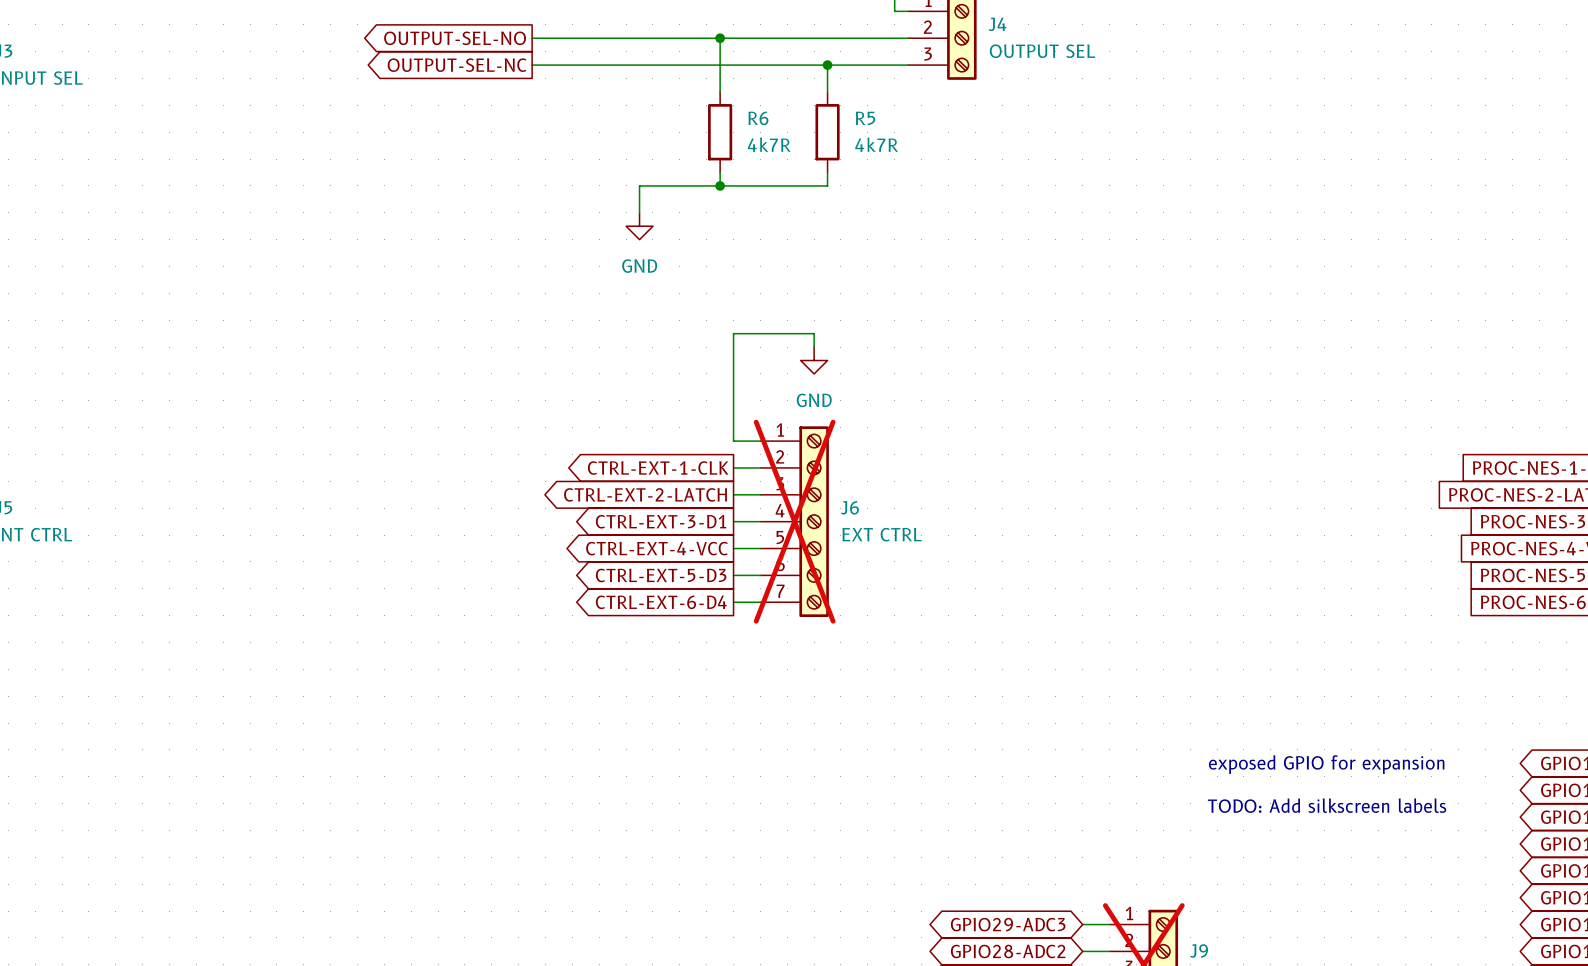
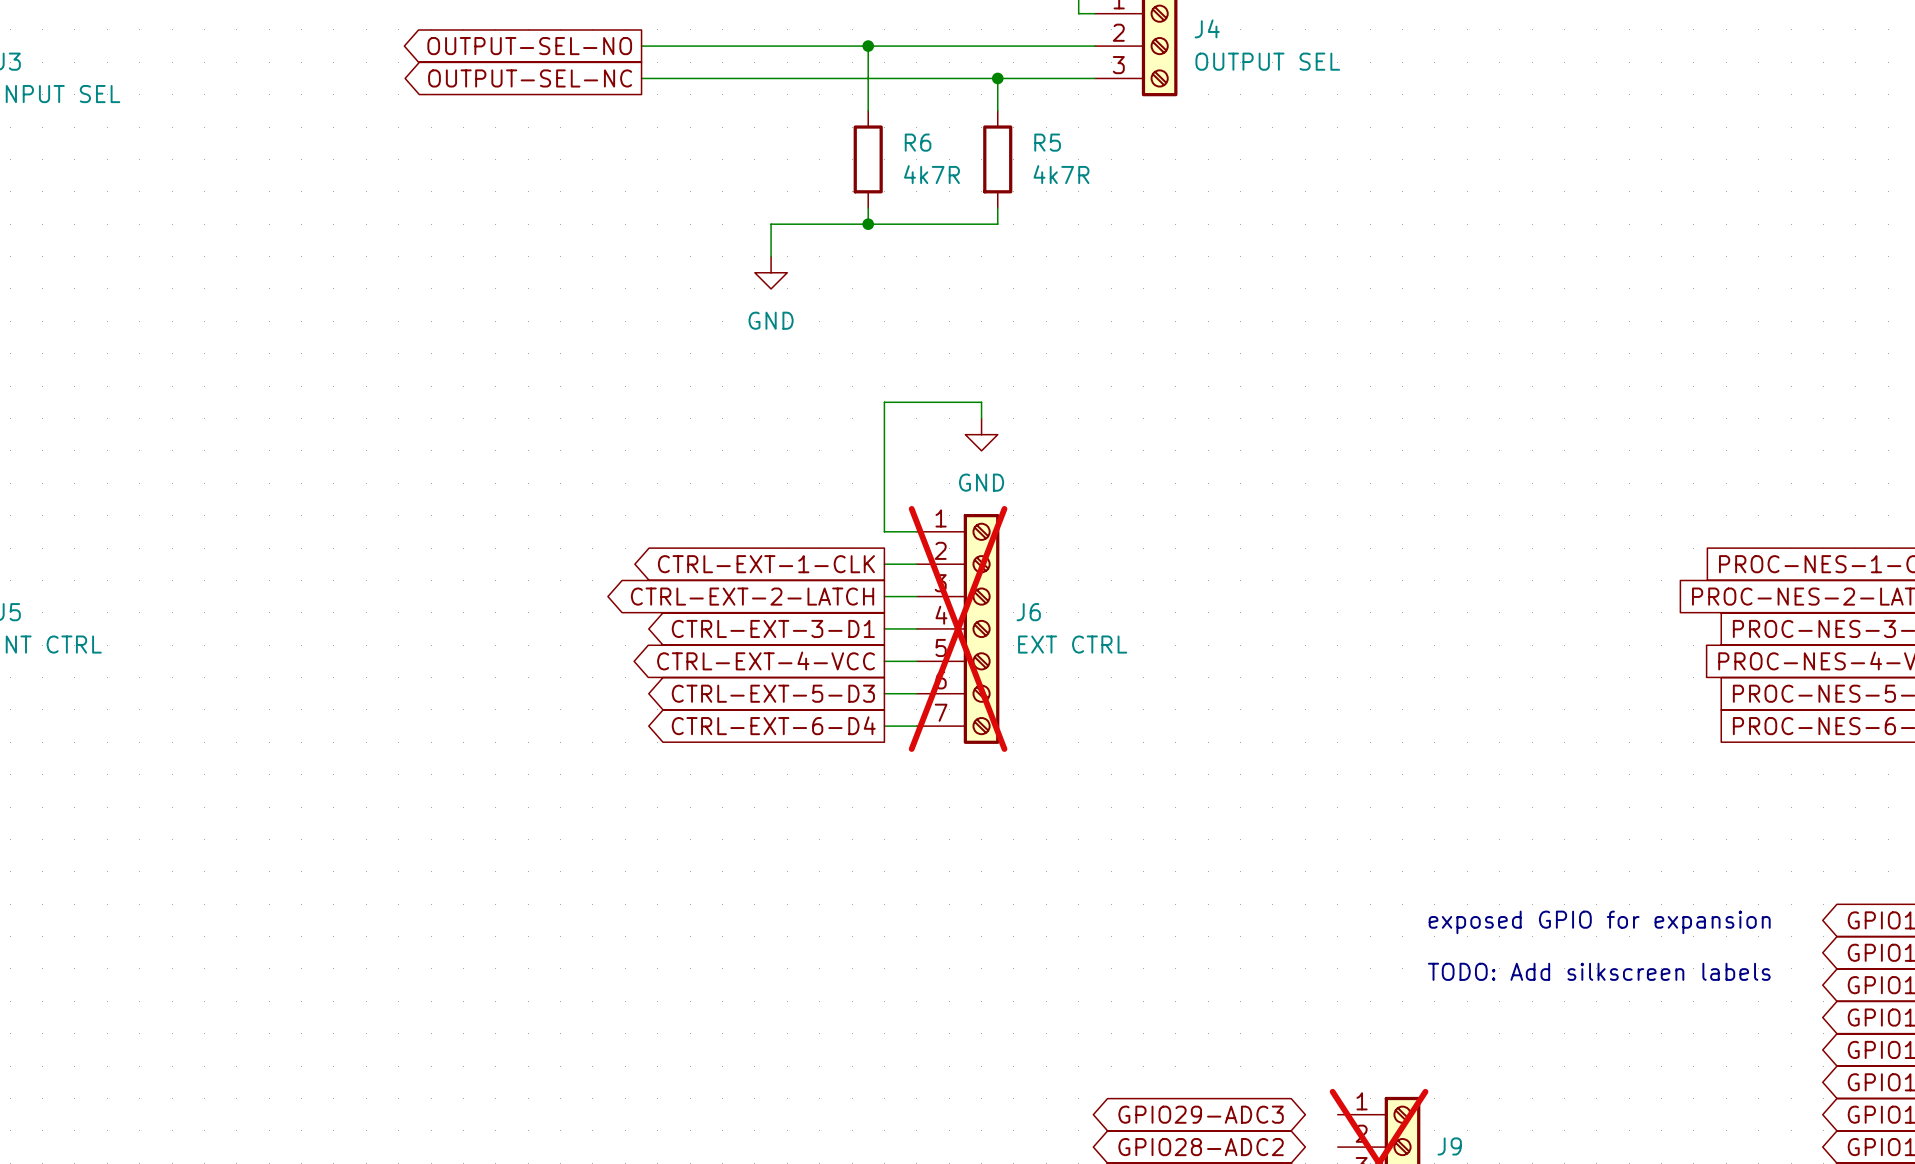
wire: (1082, 924) (1109, 924) -> none
wire: (1082, 951) (1109, 951) -> none

